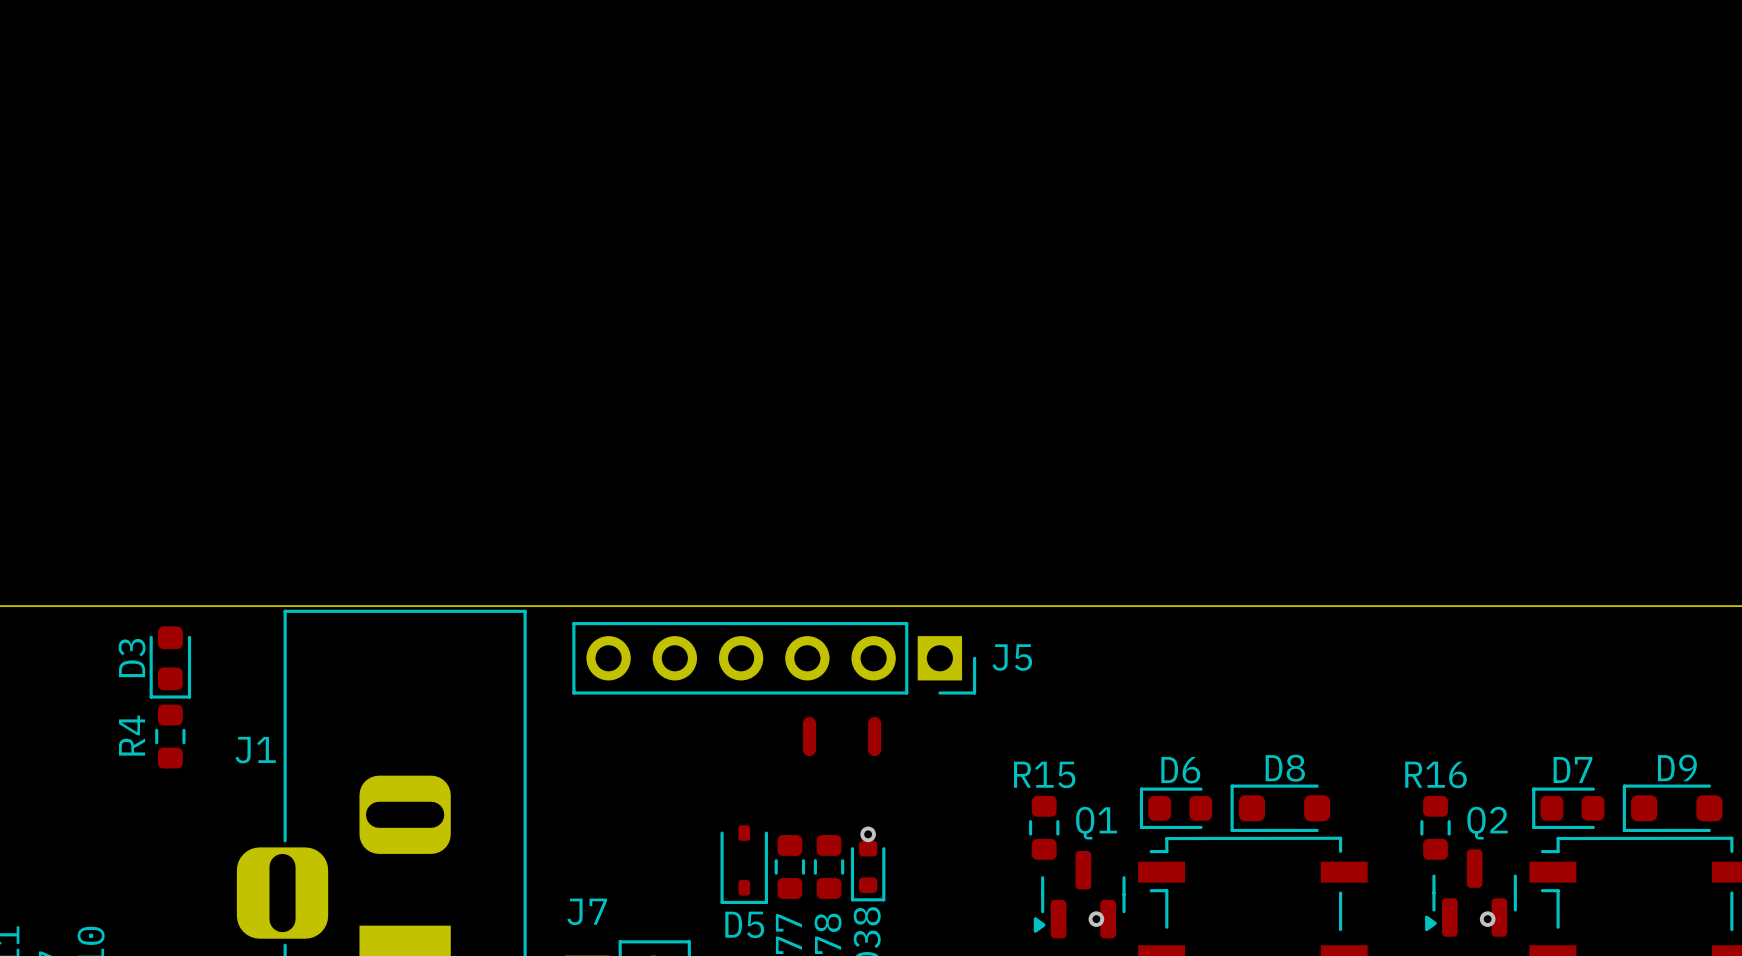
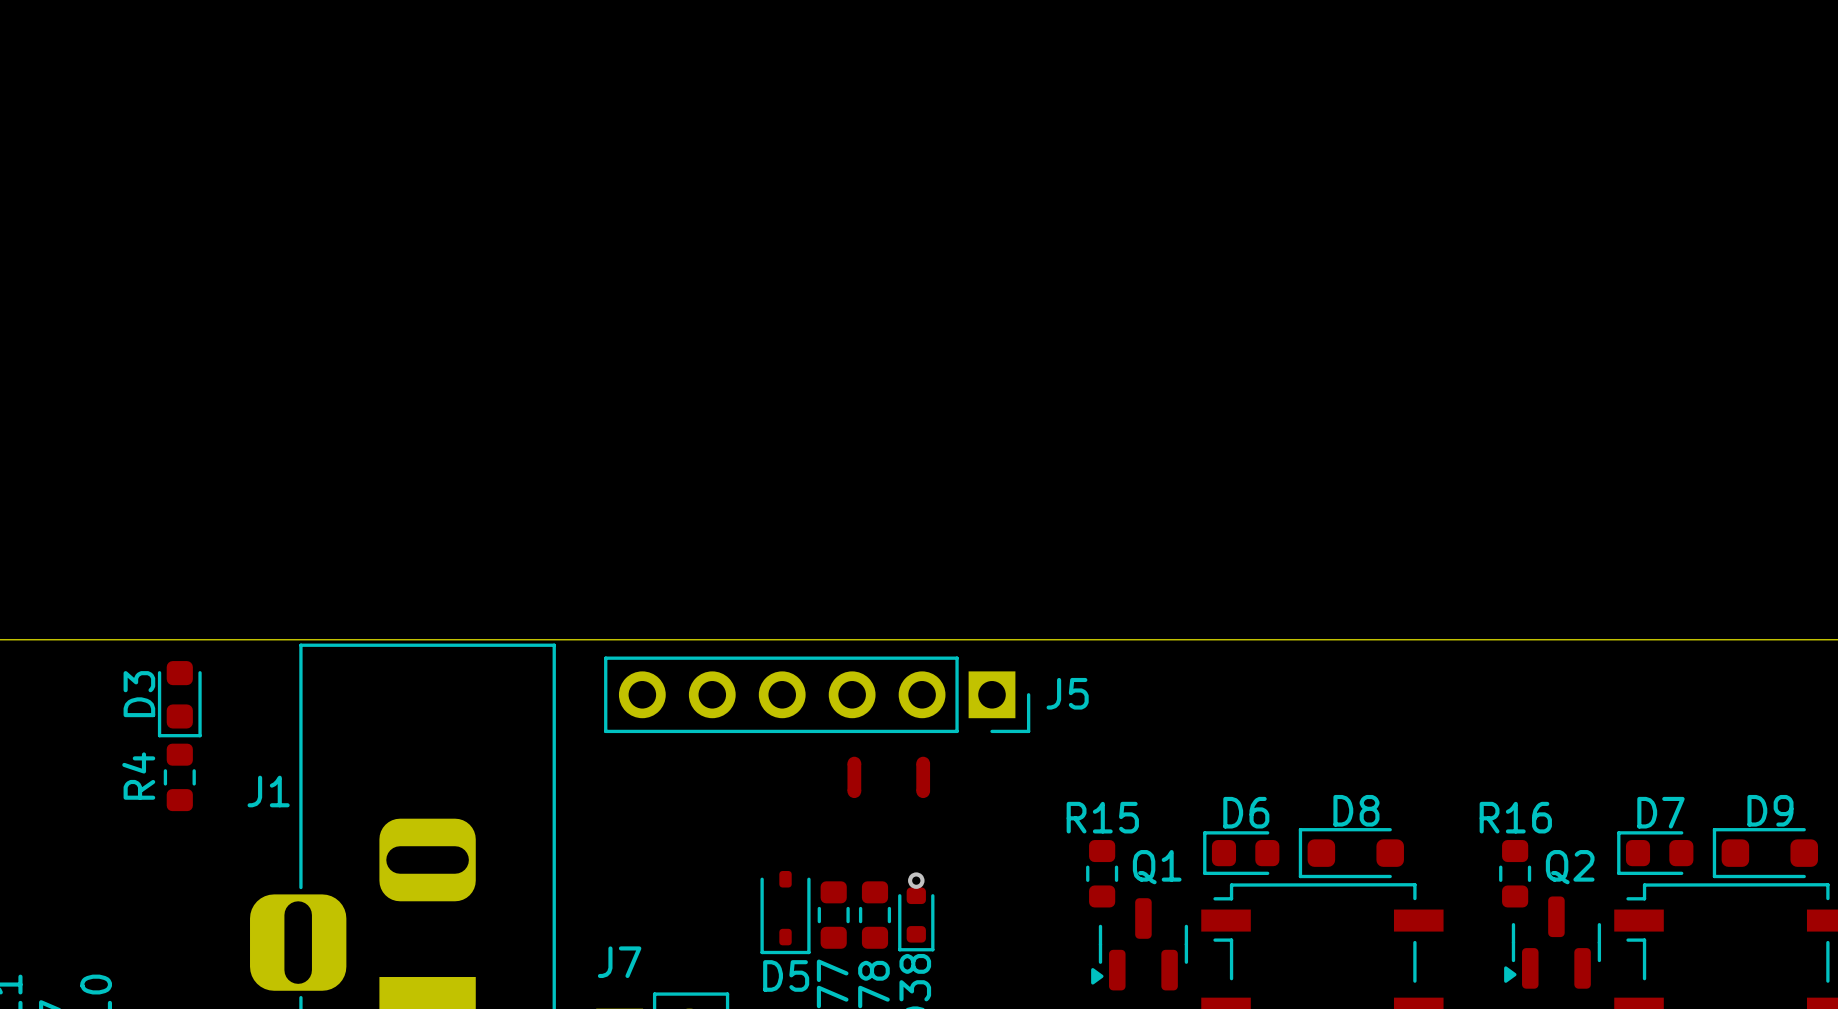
via: (1096, 919) -> none
via: (1487, 919) -> none

